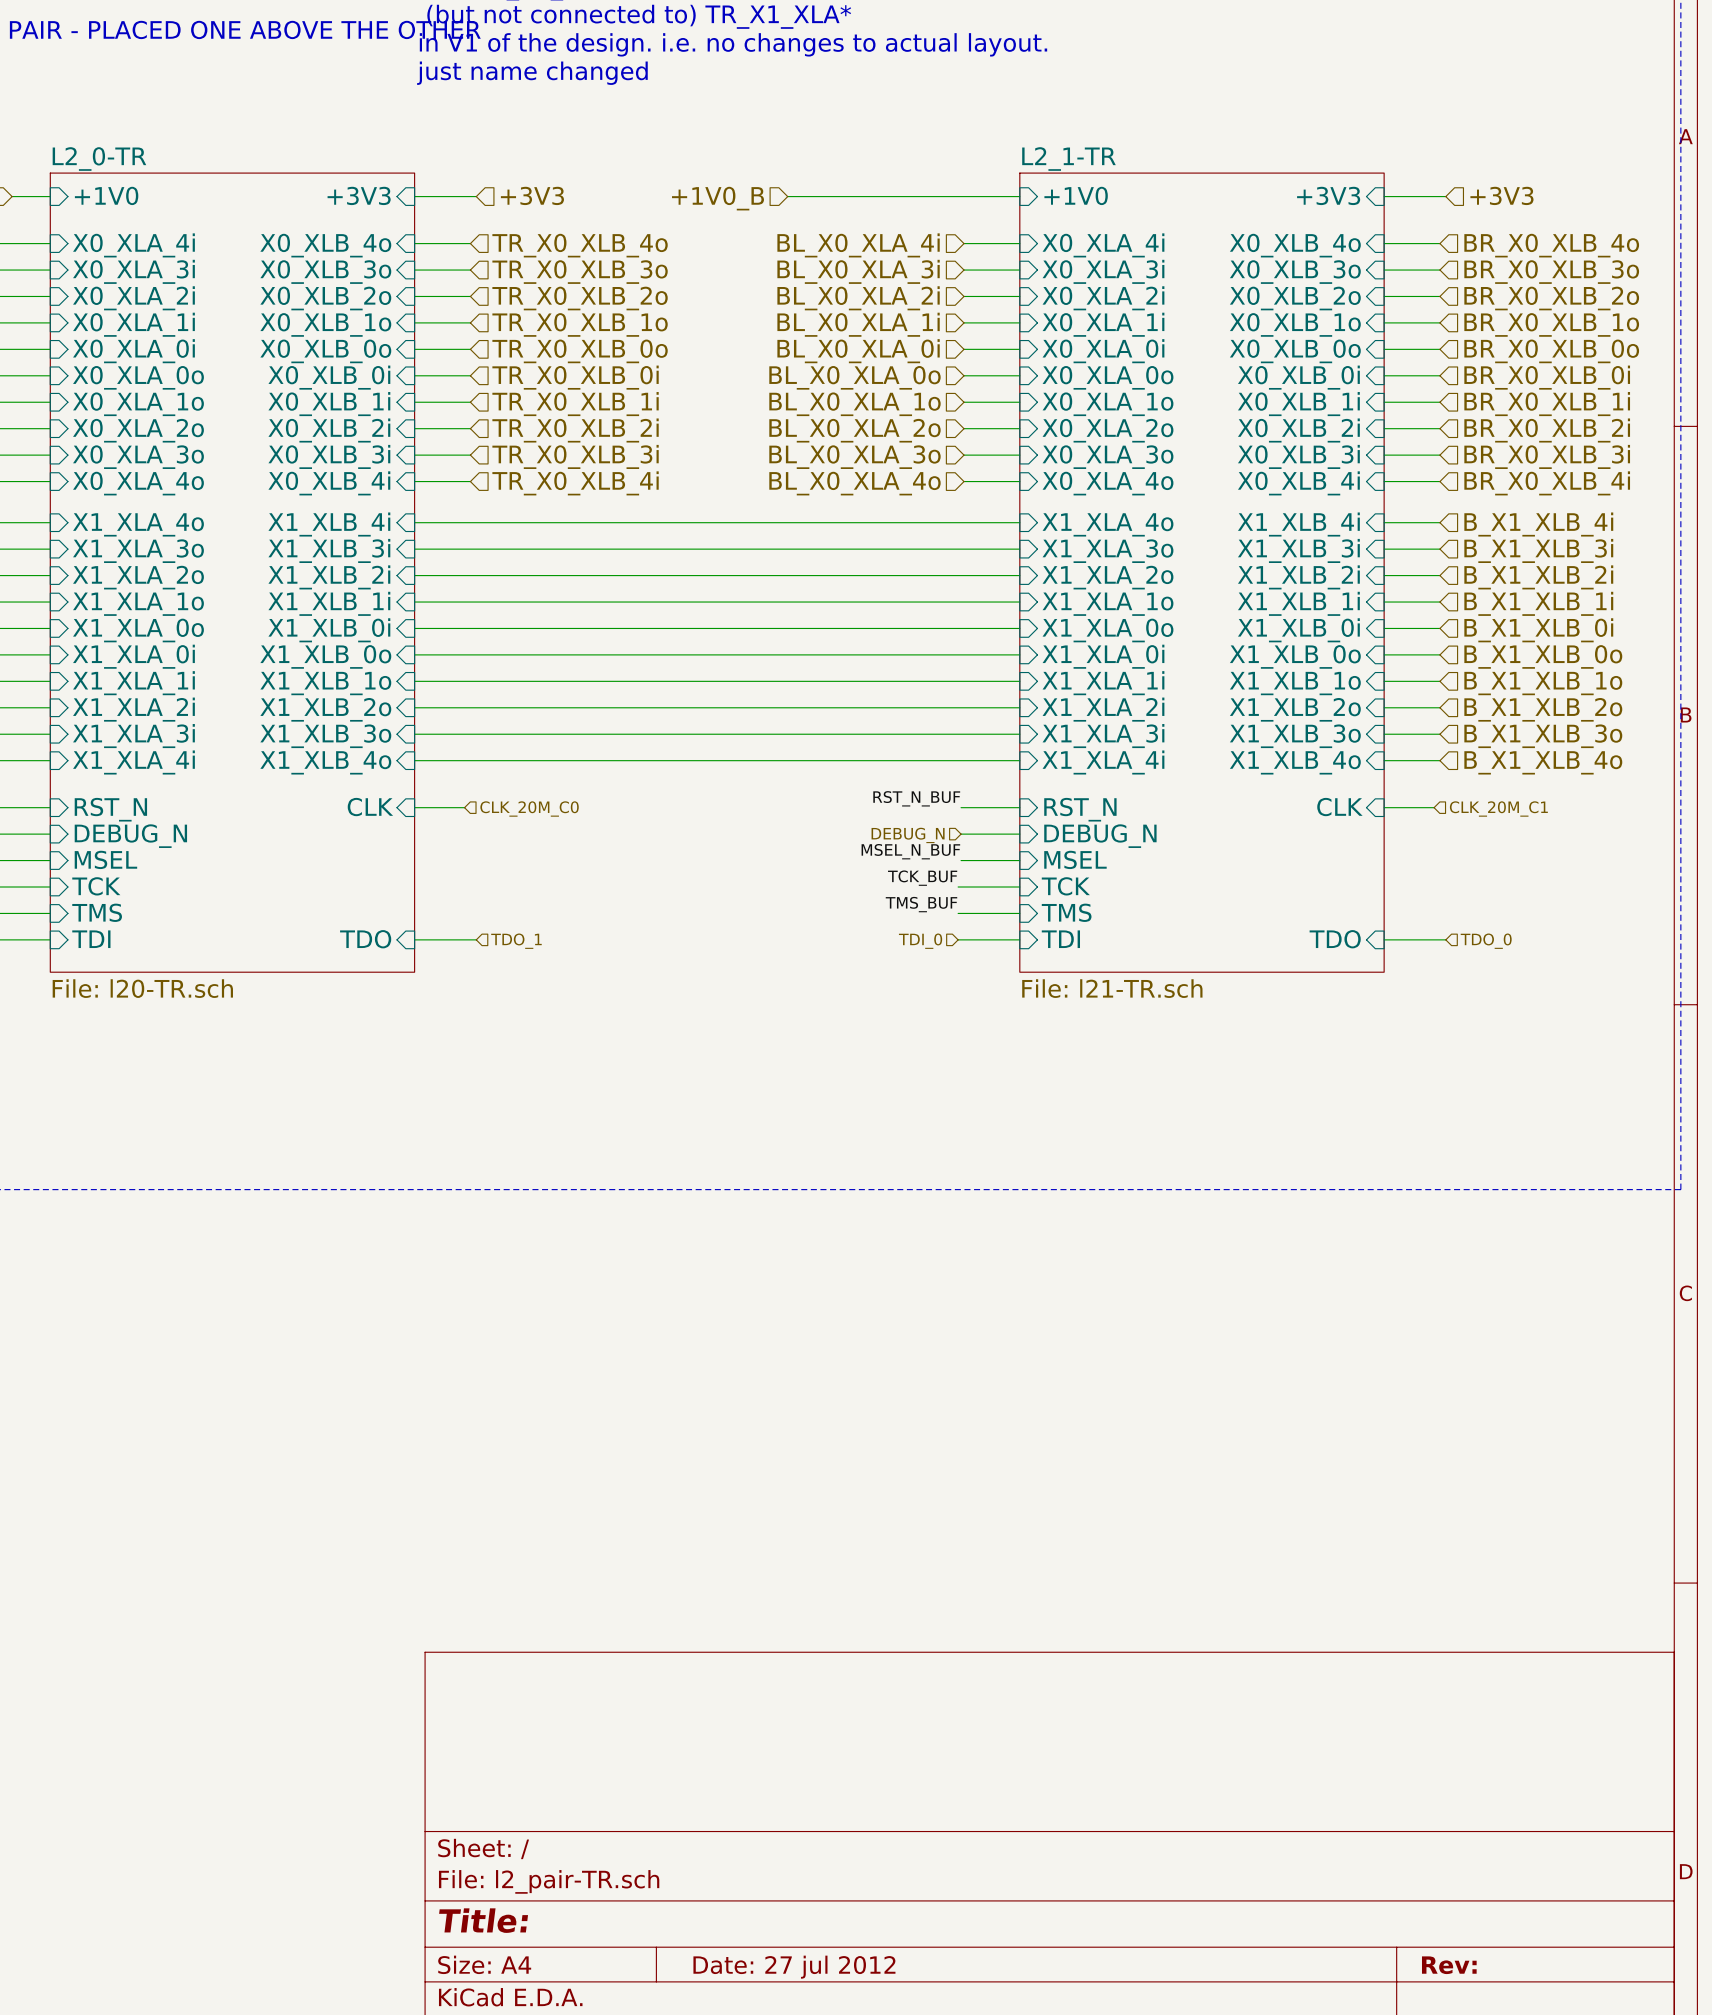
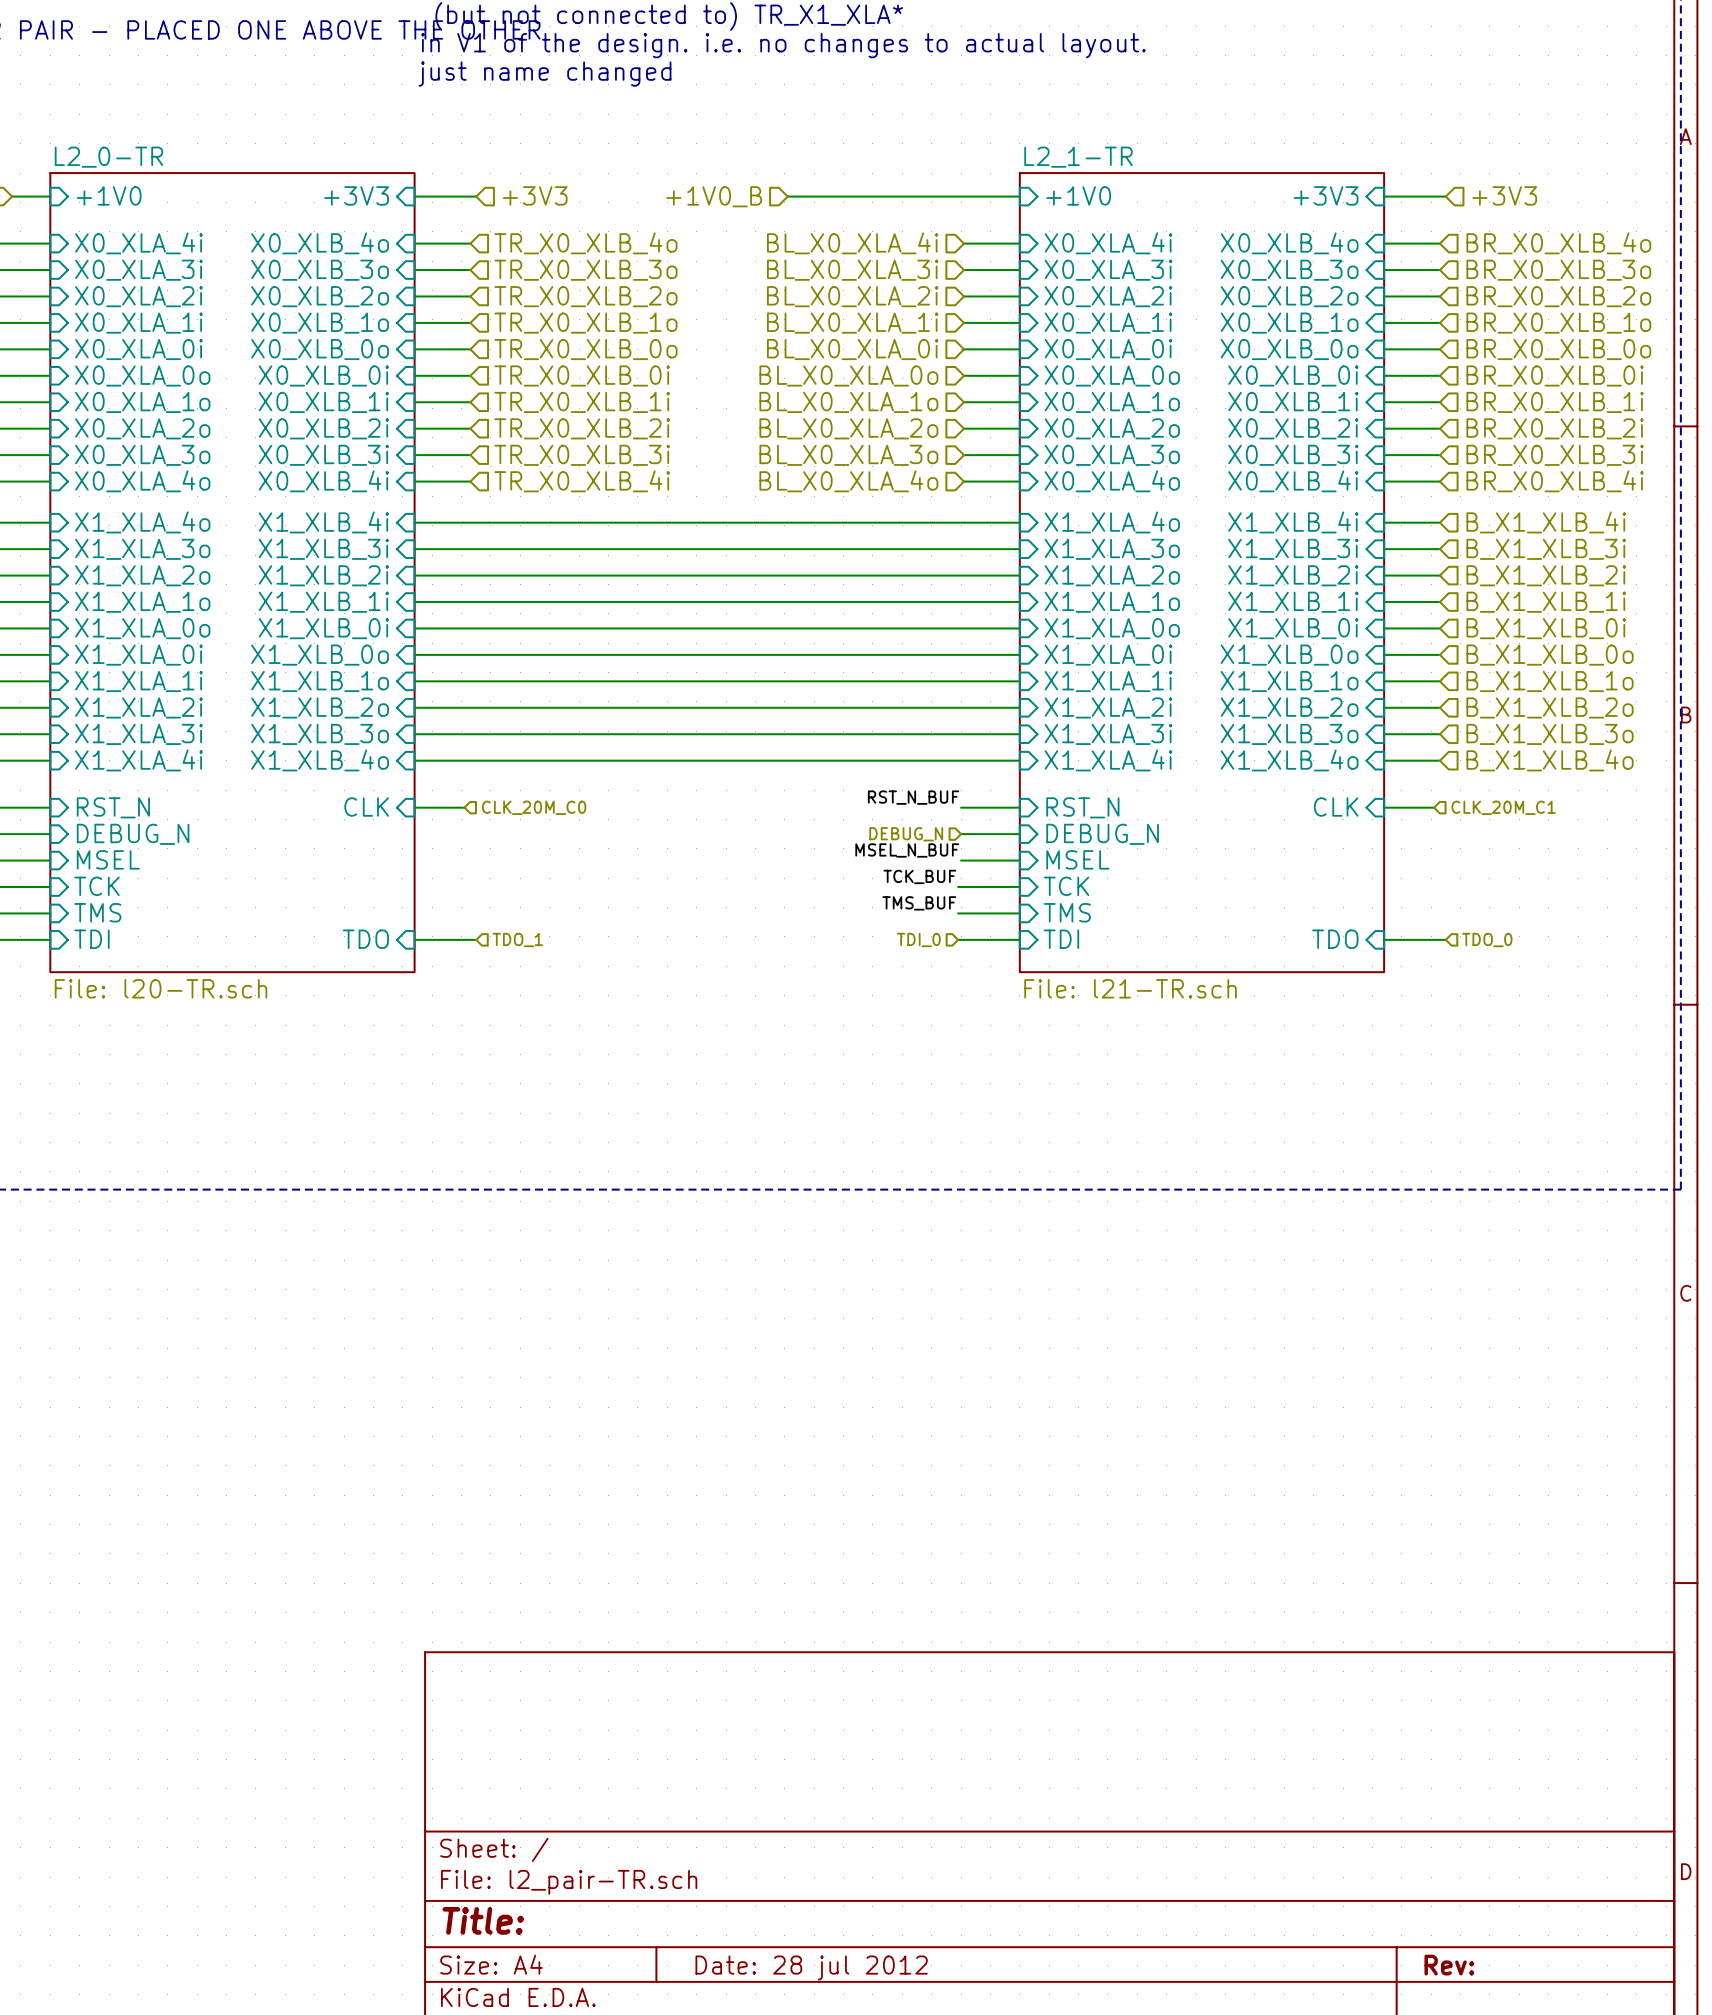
title block: Date: 27 jul 2012 (794, 1967) -> Date: 28 jul 2012 (811, 1967)

